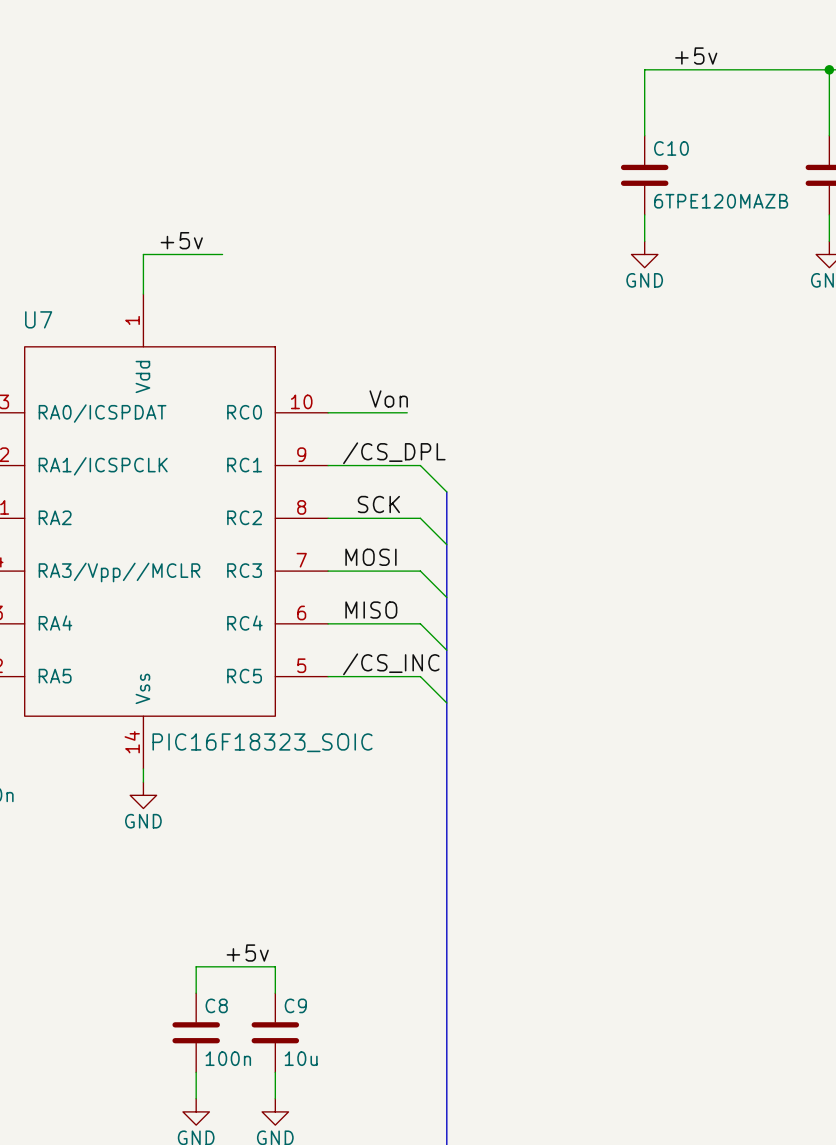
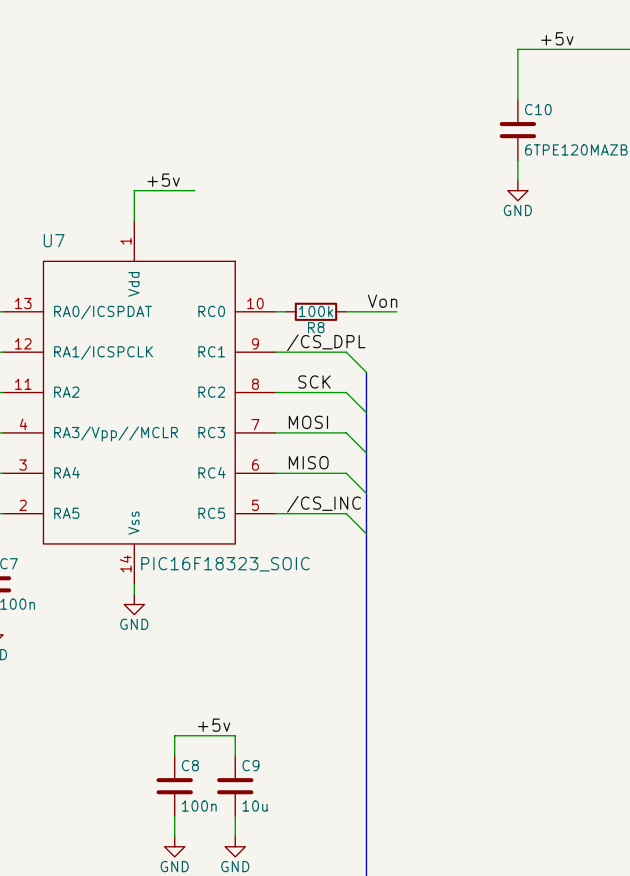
label position: Von (388, 398) -> Von (382, 301)
wire: (341, 412) (407, 412) -> (346, 311) (396, 311)
R8: none -> 100k (316, 311)

